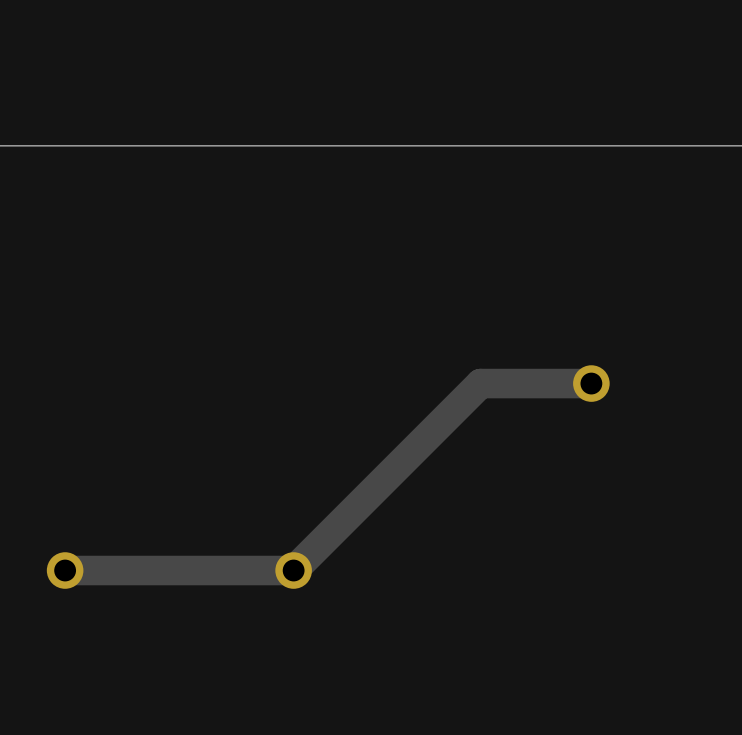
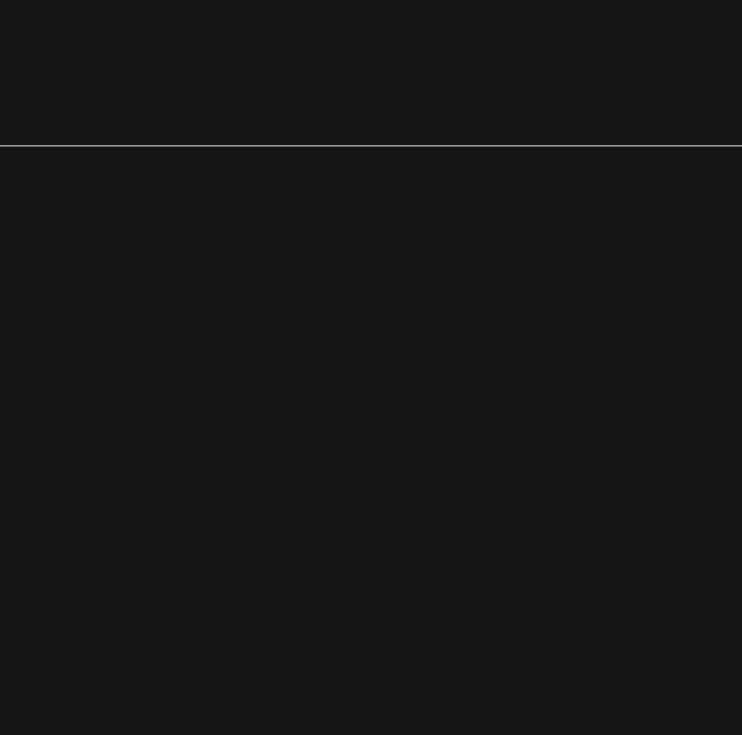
track: (591, 383) (480, 383) (293, 570) (65, 570) -> none
via: (591, 383) -> none
via: (65, 570) -> none
via: (293, 570) -> none

